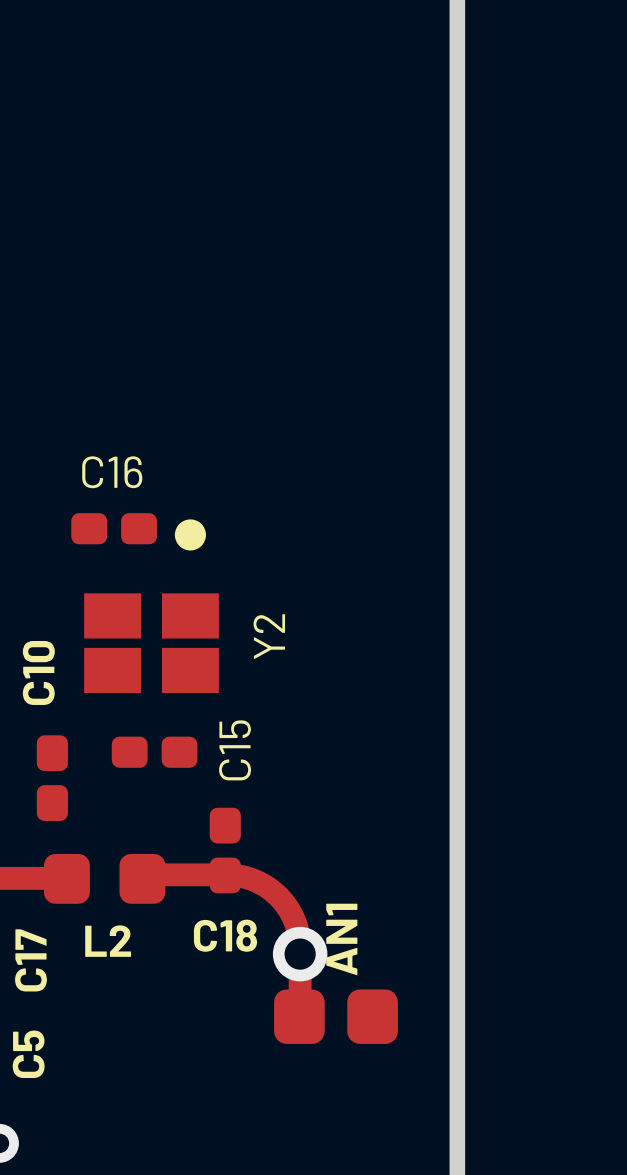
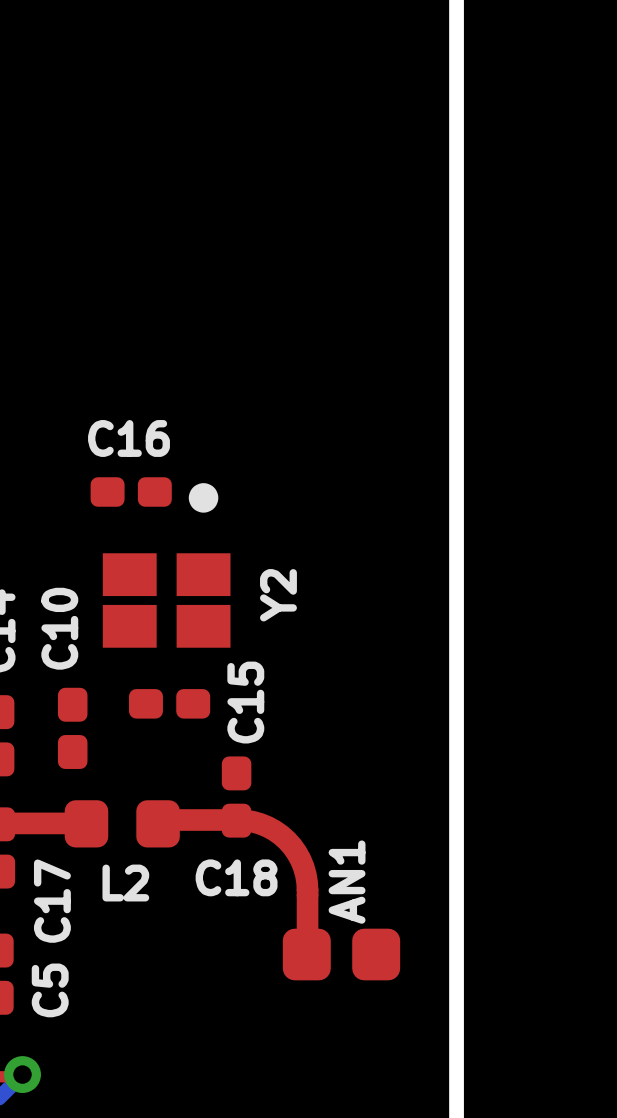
via: (300, 954) -> none

